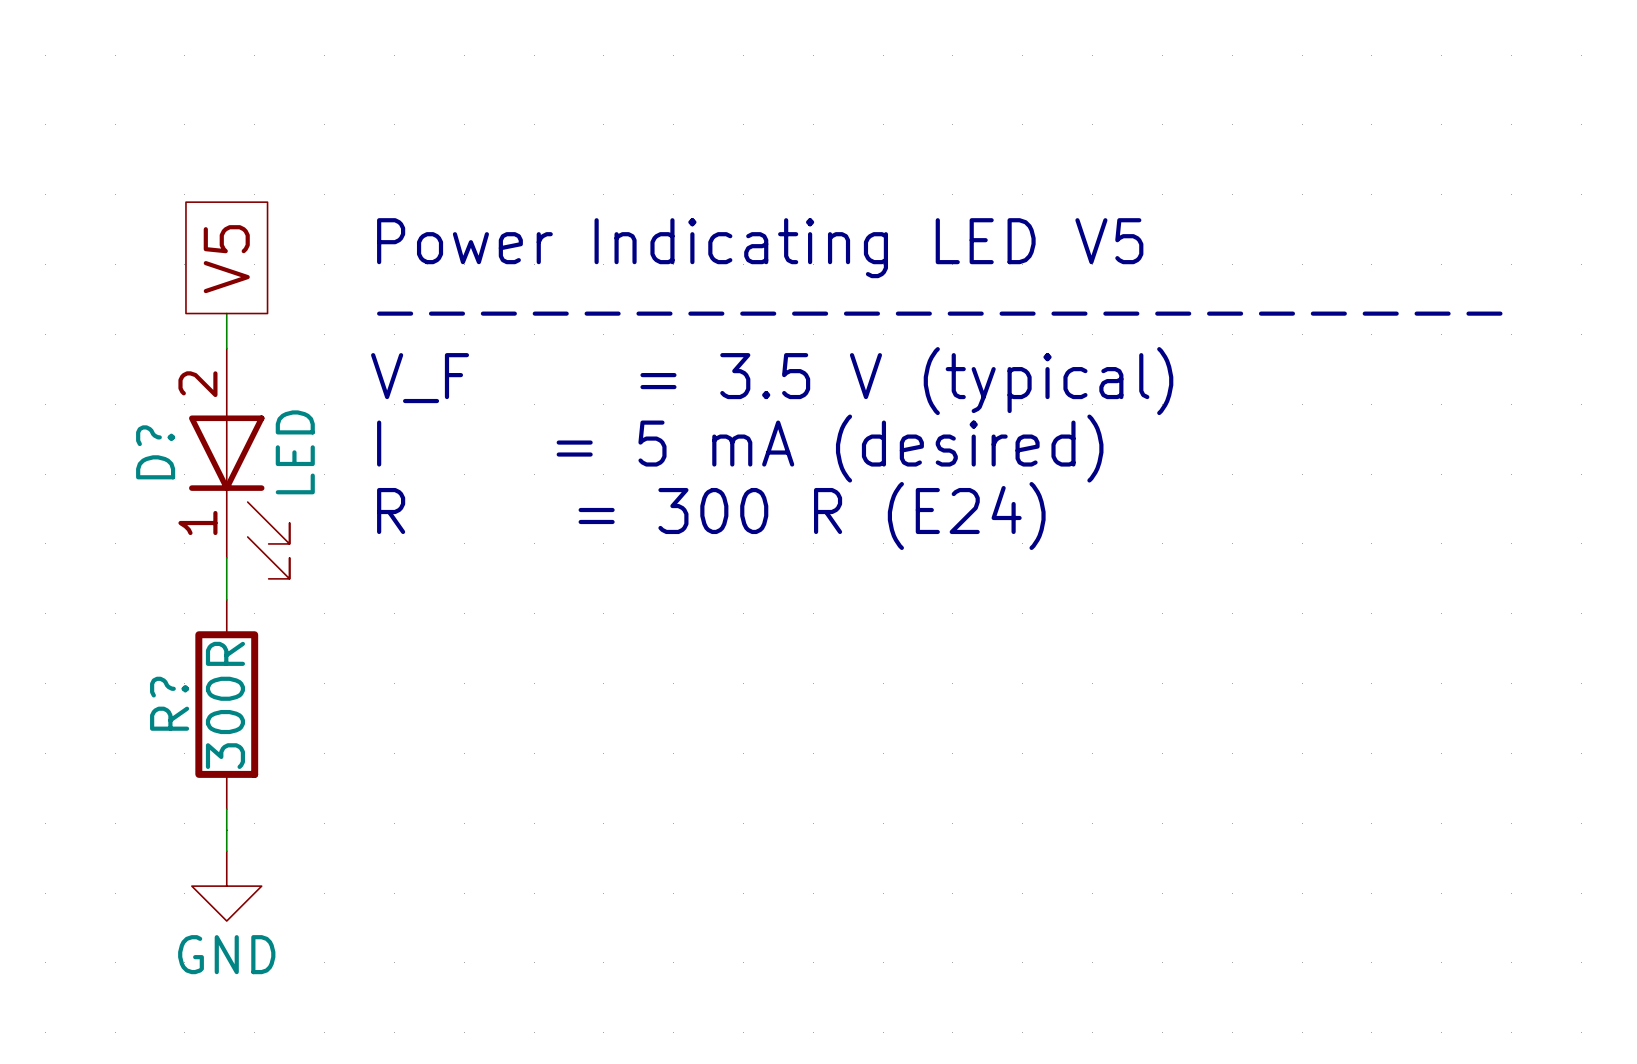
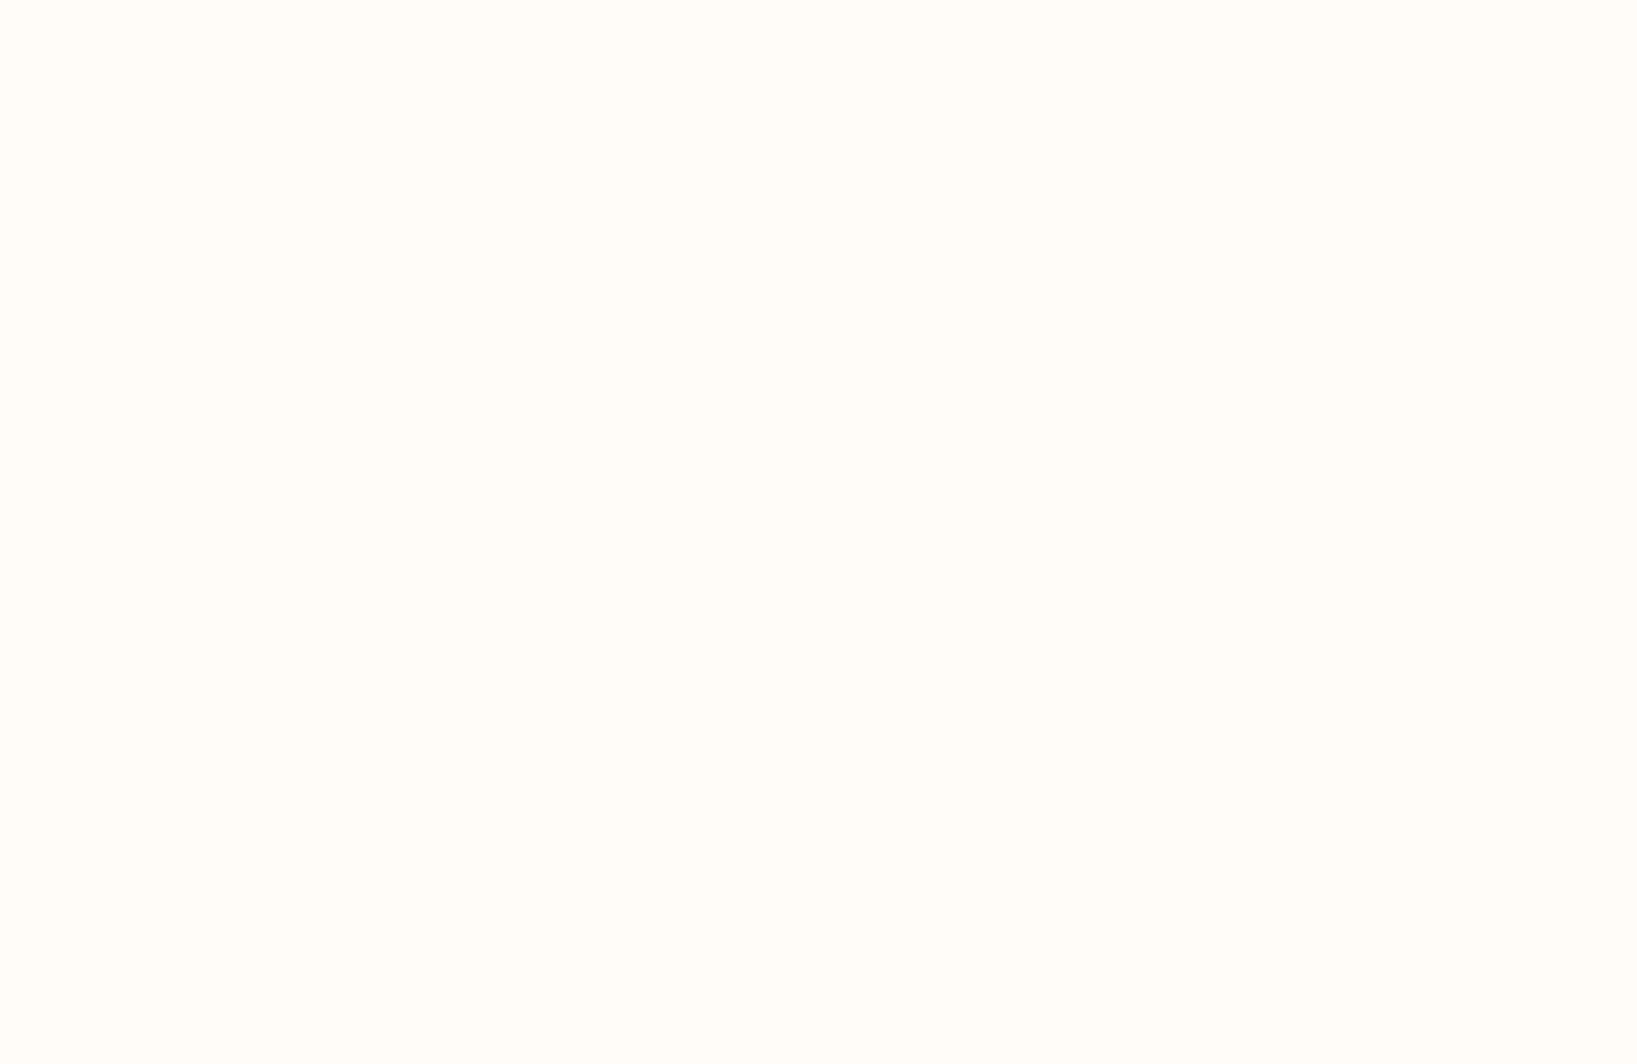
text: Power Indicating LED V5 (760, 248) -> none
global label: V5 (226, 259) -> none
wire: (226, 313) (226, 348) -> none
text: ---------------------- (939, 313) -> none
text: V_F = 3.5 V (typical) (772, 381) -> none
text: I = 5 mA (desired) (740, 448) -> none
D?: LED (239, 463) -> none
text: R = 300 R (E24) (711, 516) -> none
wire: (226, 557) (226, 599) -> none
R?: 300R (226, 704) -> none
wire: (226, 809) (226, 851) -> none
power symbol: GND (226, 886) -> none

